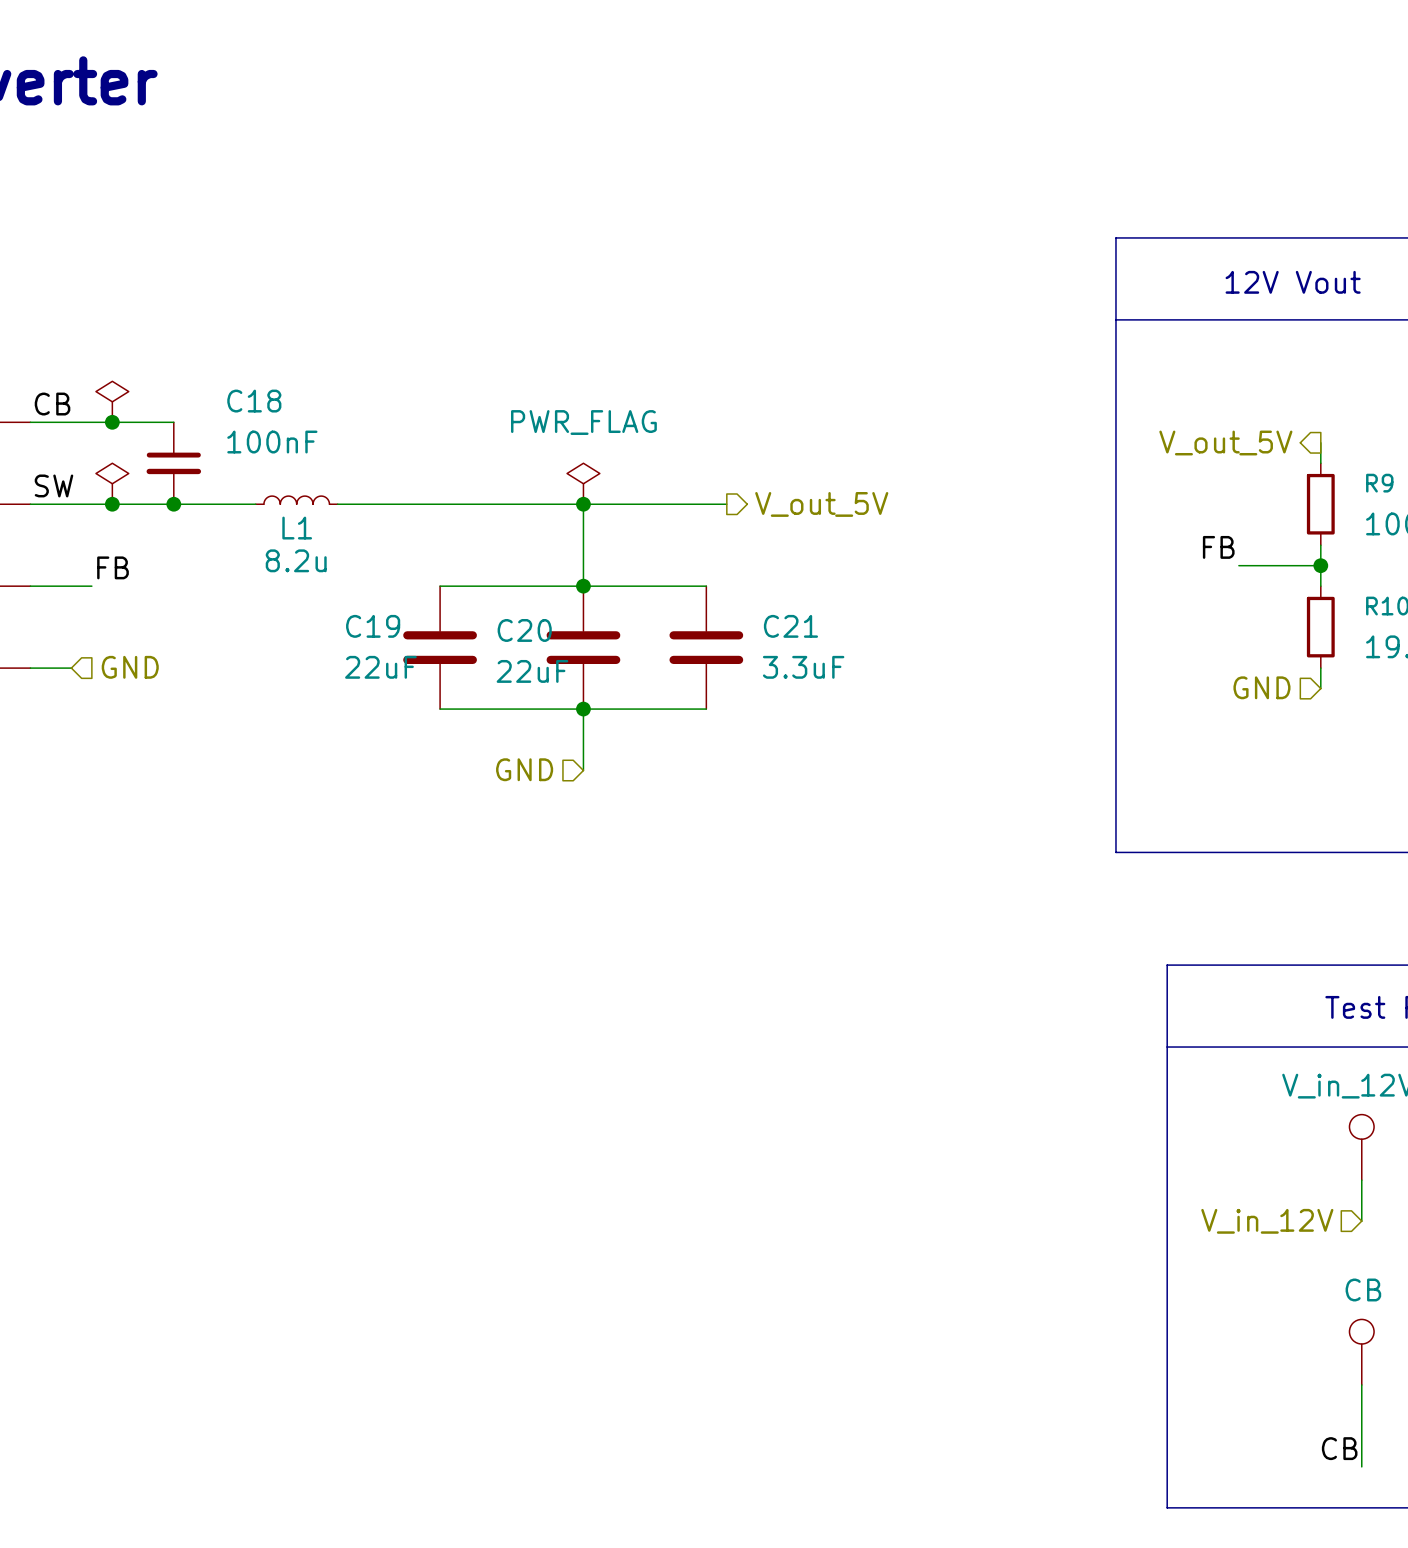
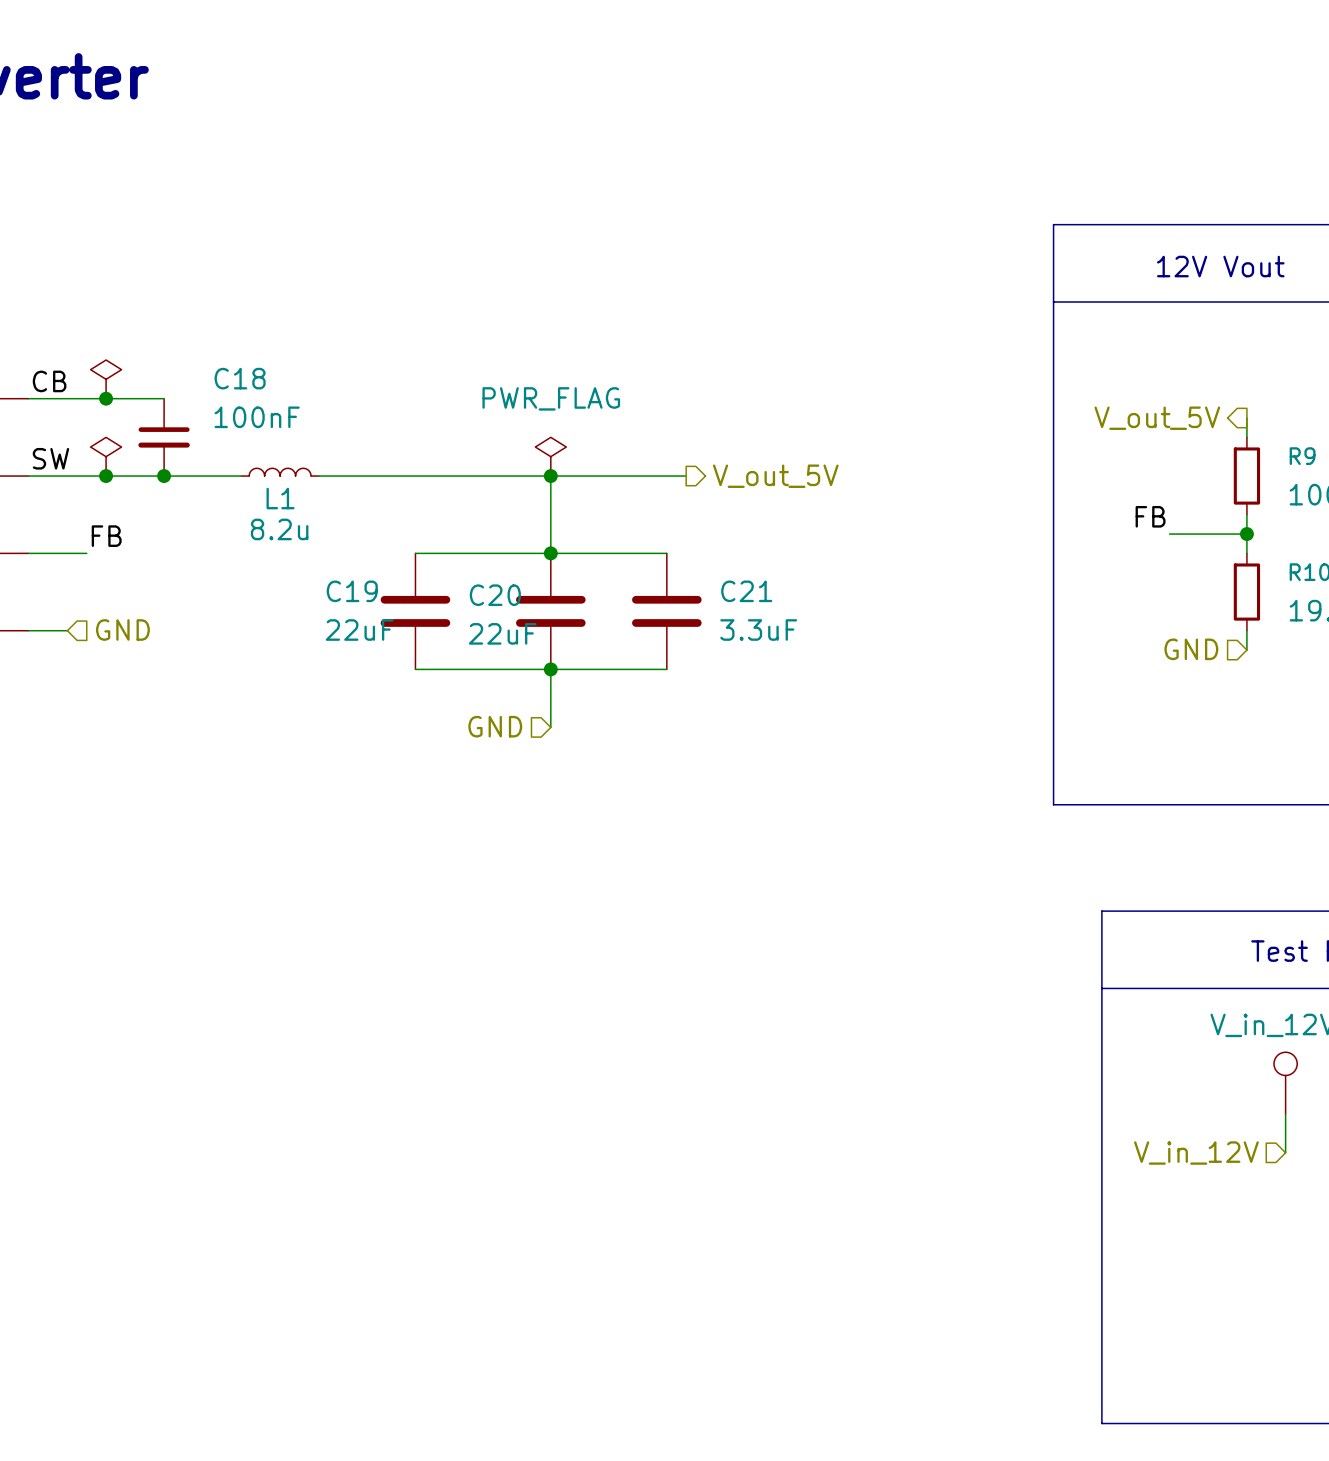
part: CB (1361, 1352) -> none
wire: (1361, 1384) (1361, 1466) -> none
label: CB (1339, 1448) -> none

